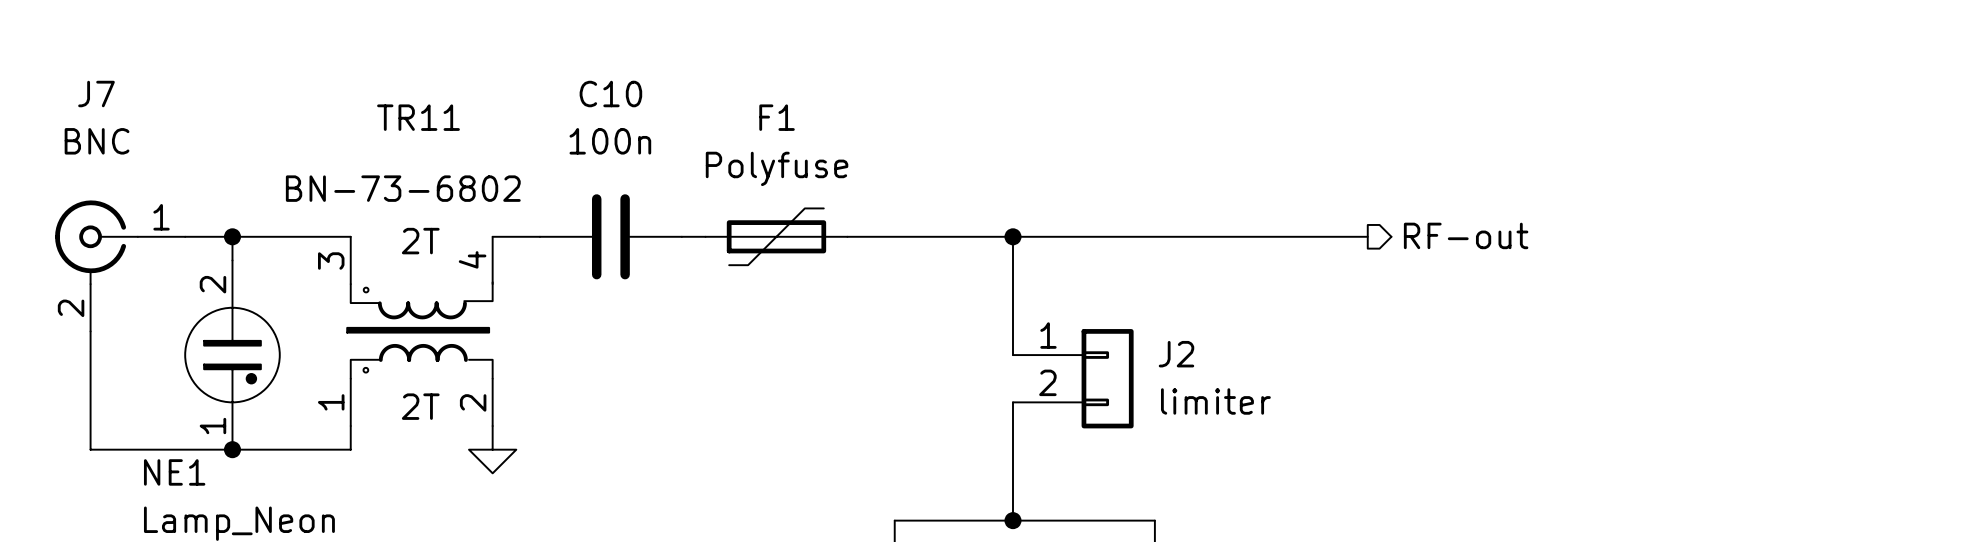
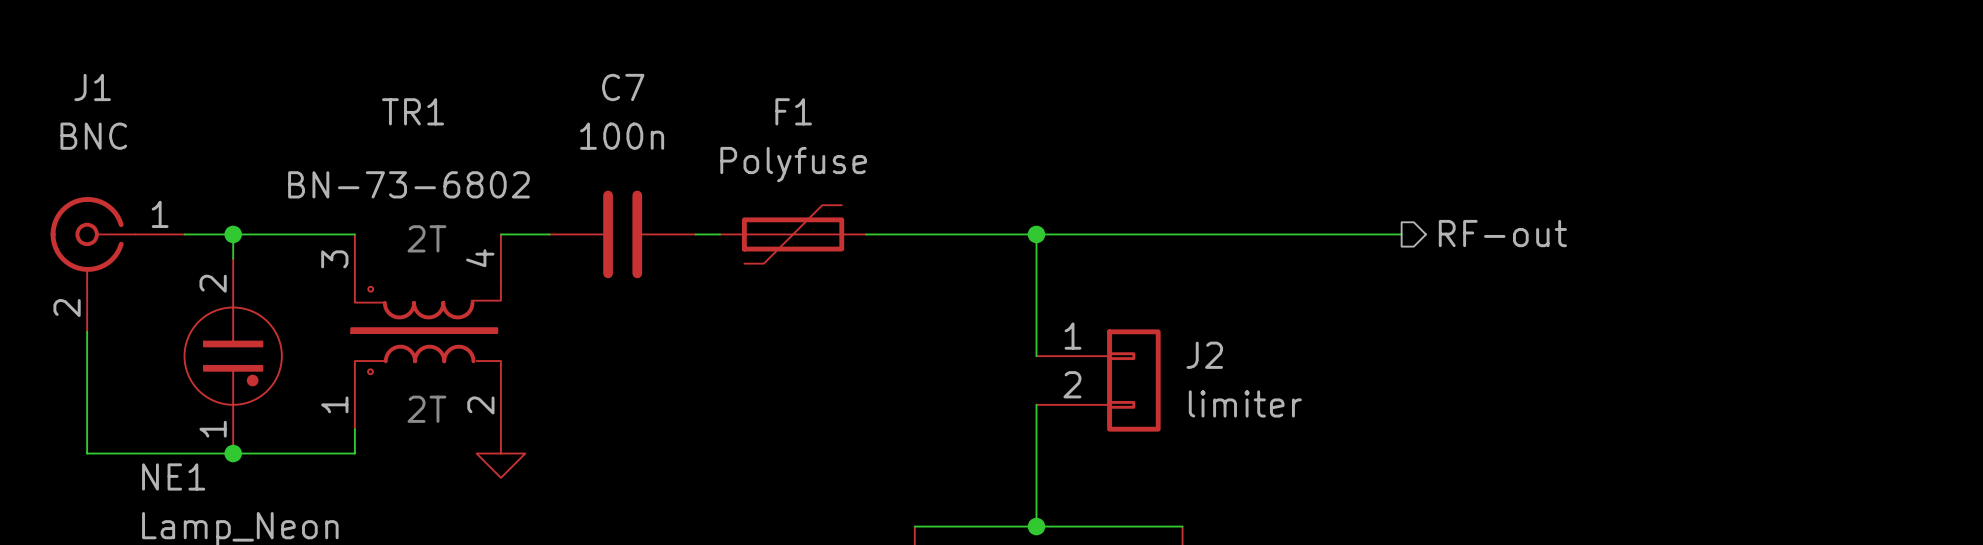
J7 name: J7 (96, 94) -> J1 (92, 87)
C10 name: C10 (610, 94) -> C7 (623, 87)
TR11 name: TR11 (418, 117) -> TR1 (413, 111)

